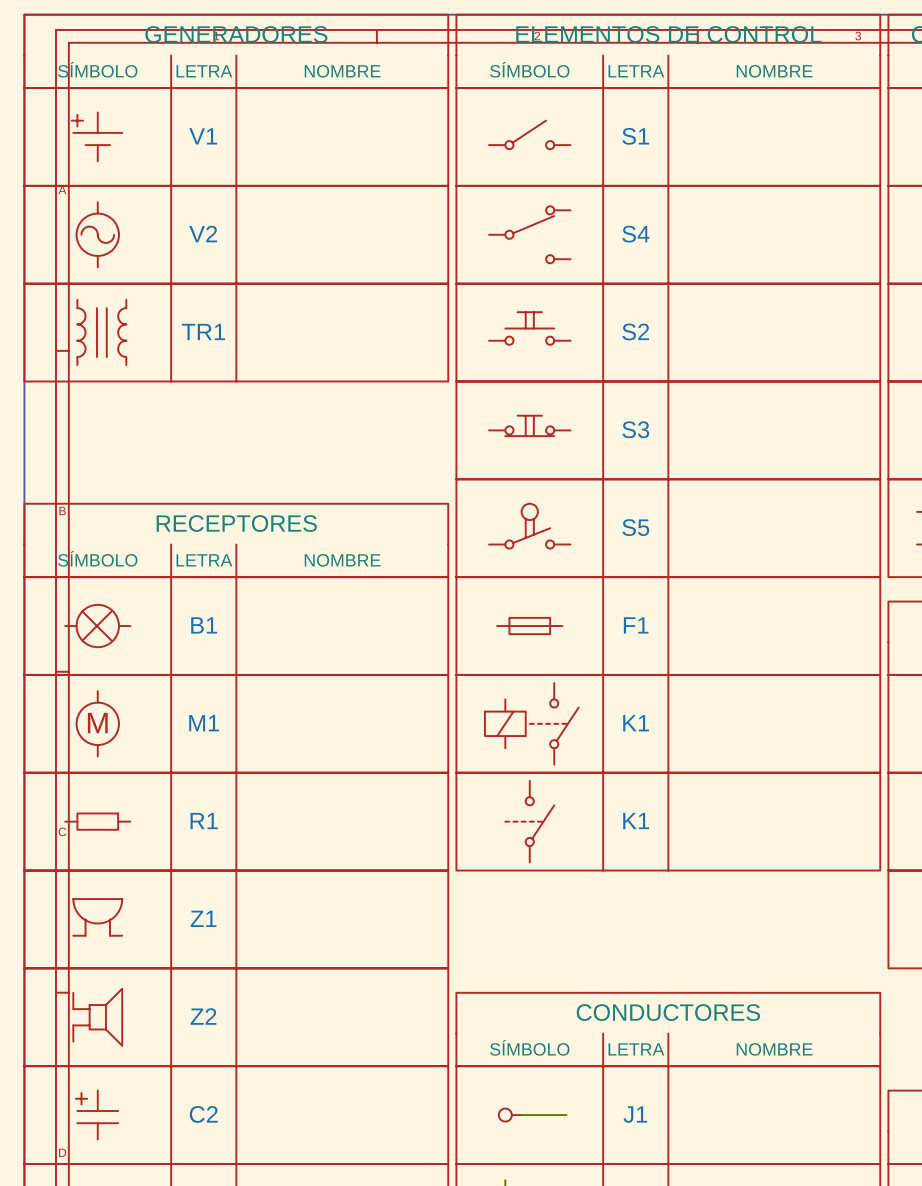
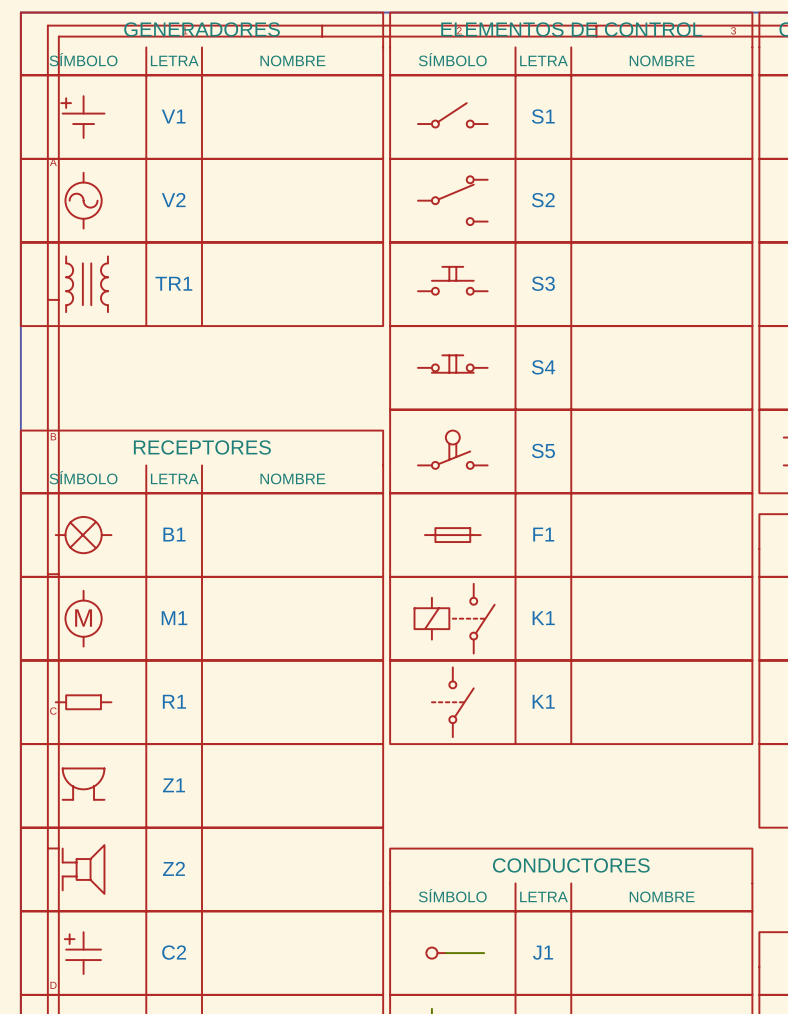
S4 name: S4 (635, 234) -> S2 (543, 200)
S2 name: S2 (635, 331) -> S3 (543, 283)
S3 name: S3 (635, 429) -> S4 (543, 367)

